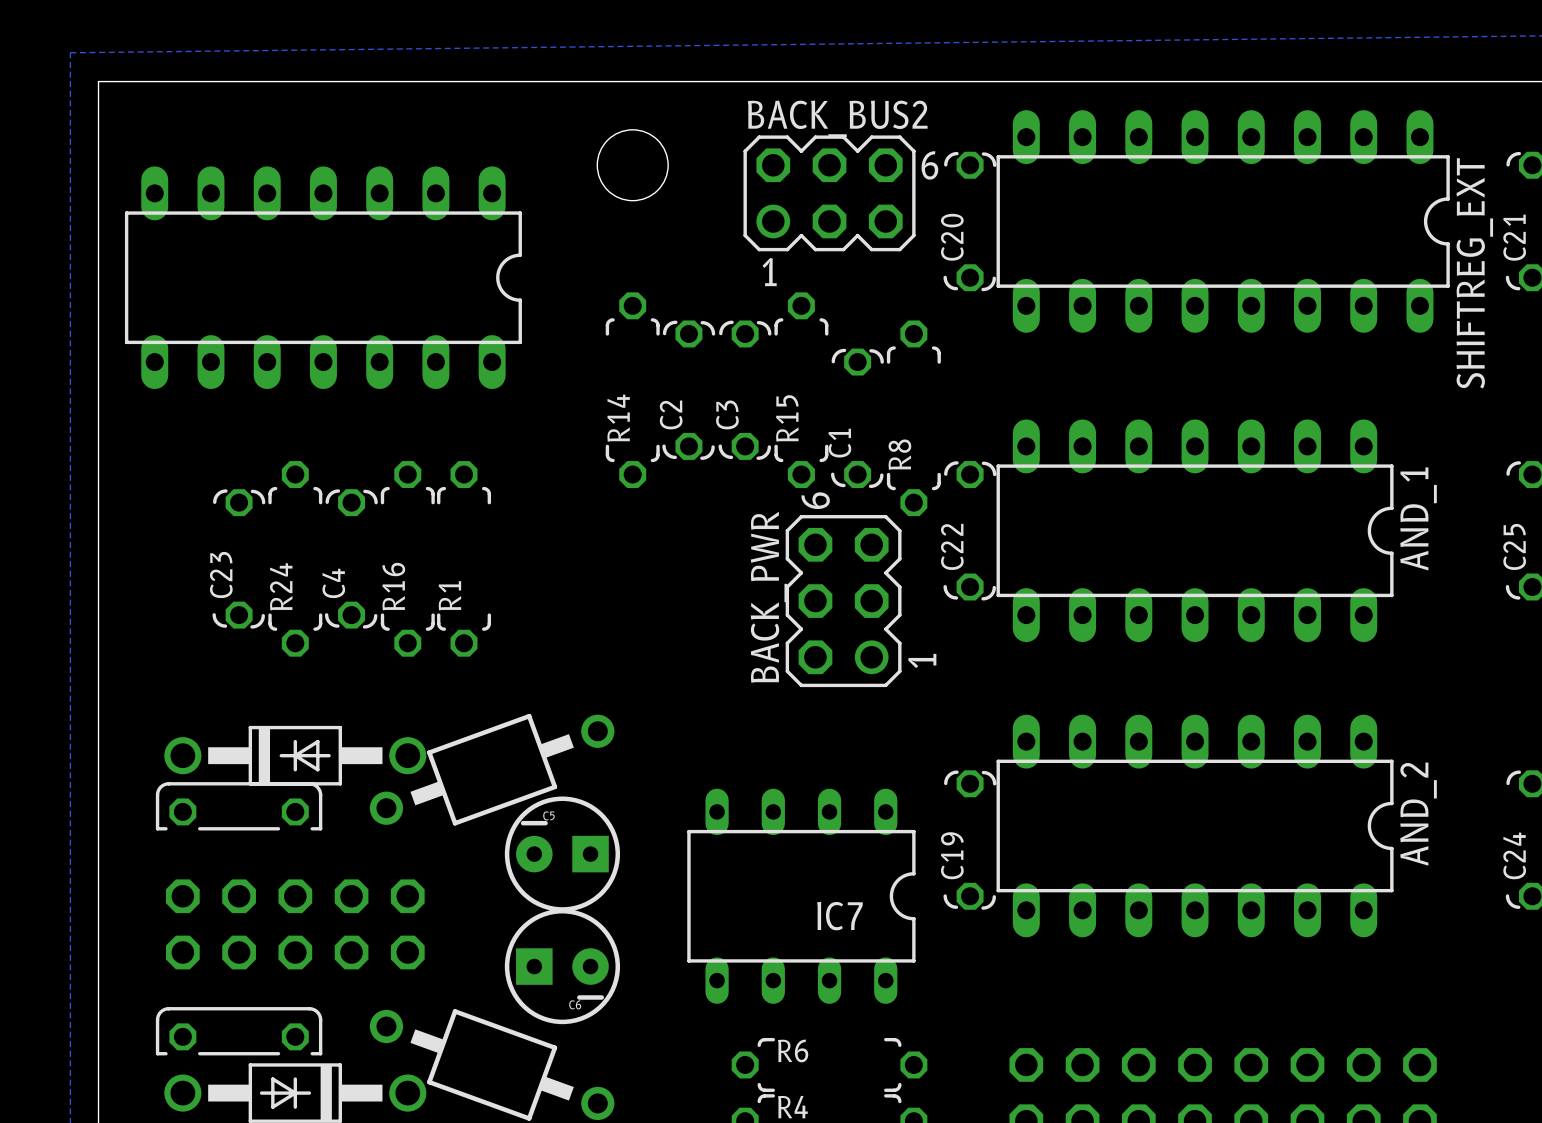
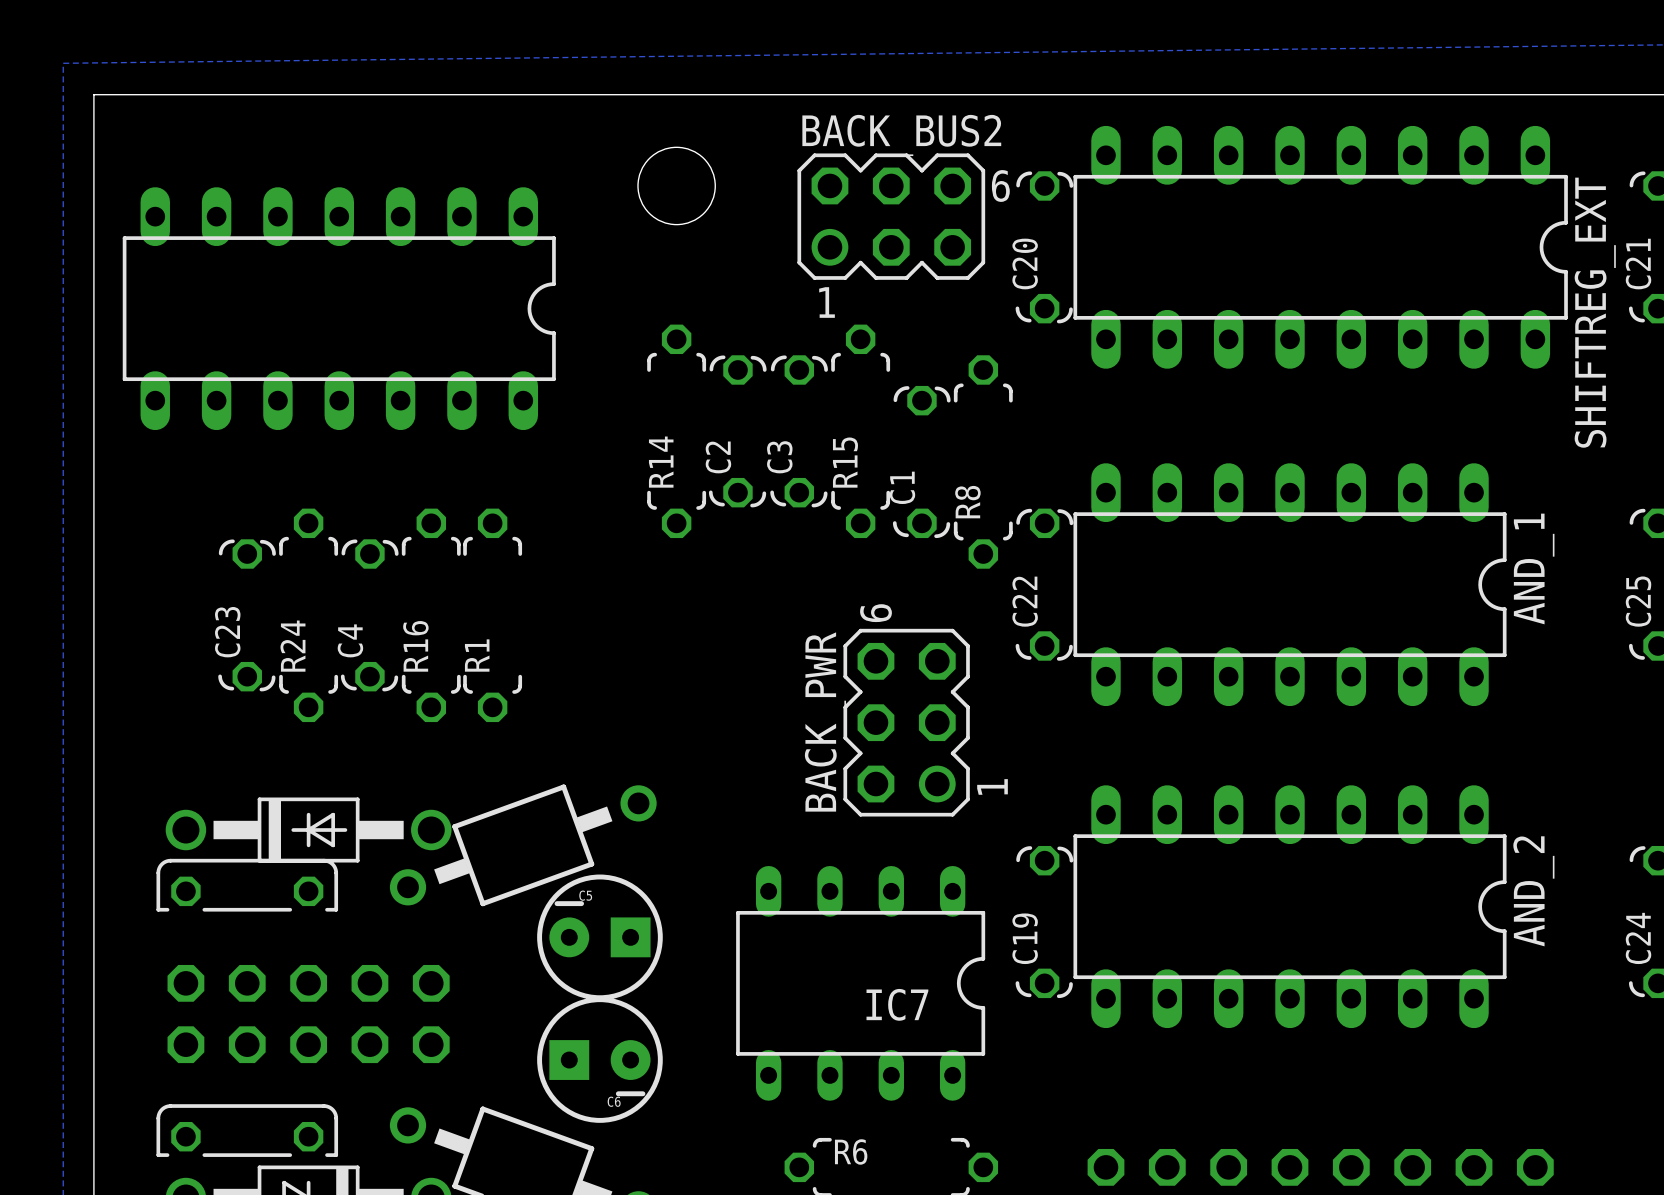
BACK_PWR position: (843, 601) -> (906, 722)

